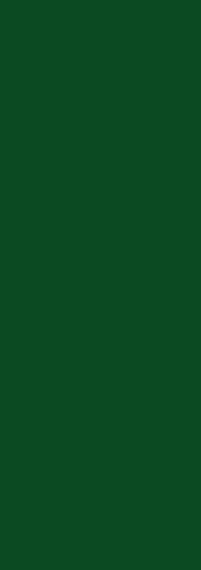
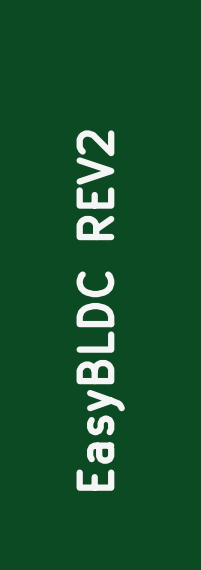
text: none -> EasyBLDC REV2 (100, 310)

